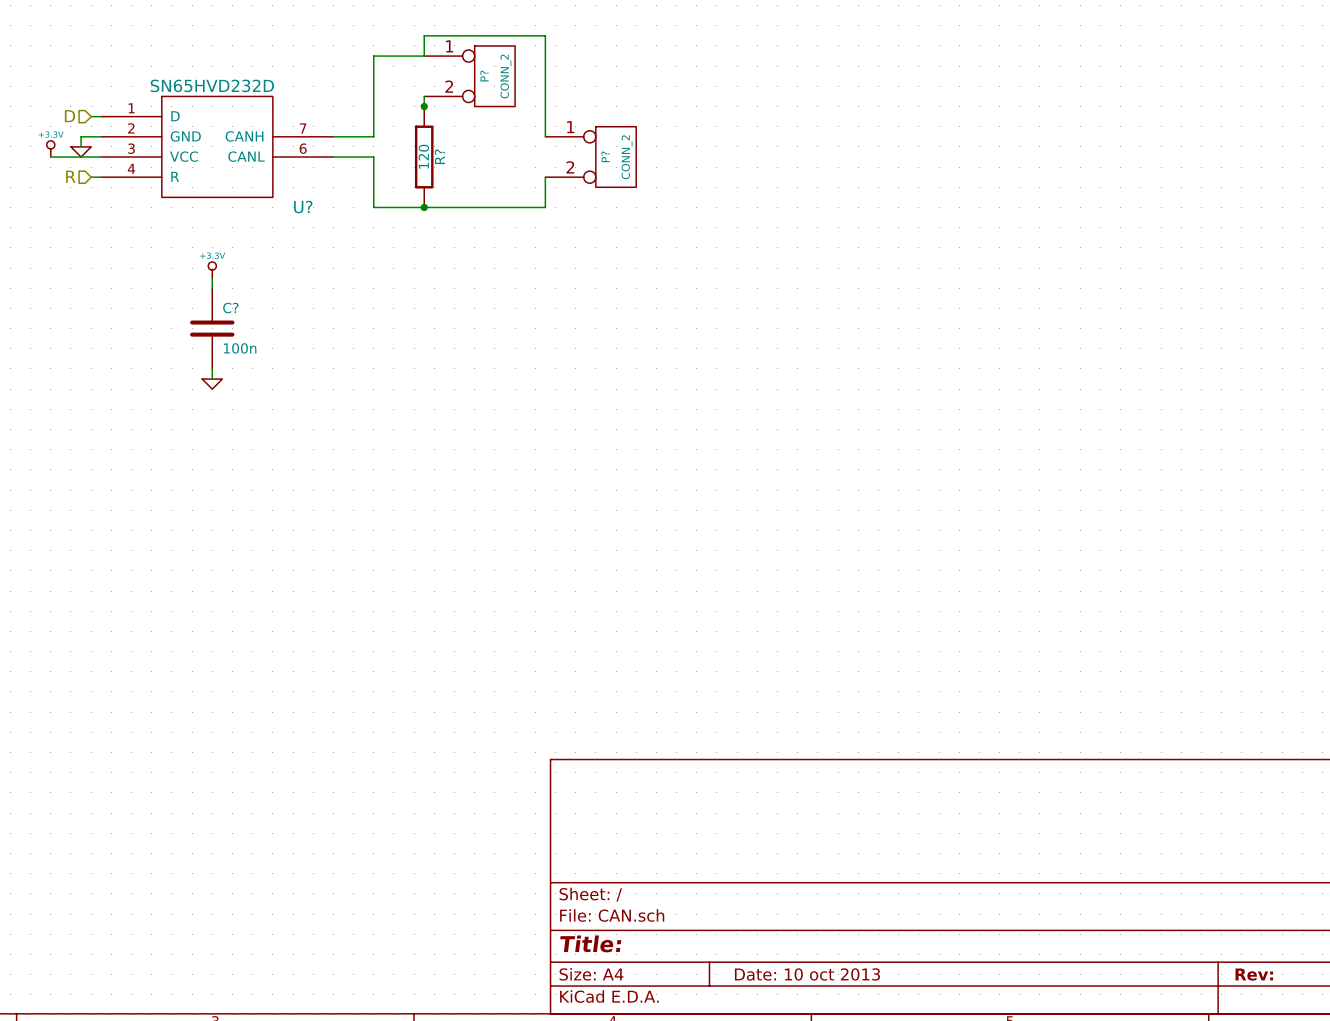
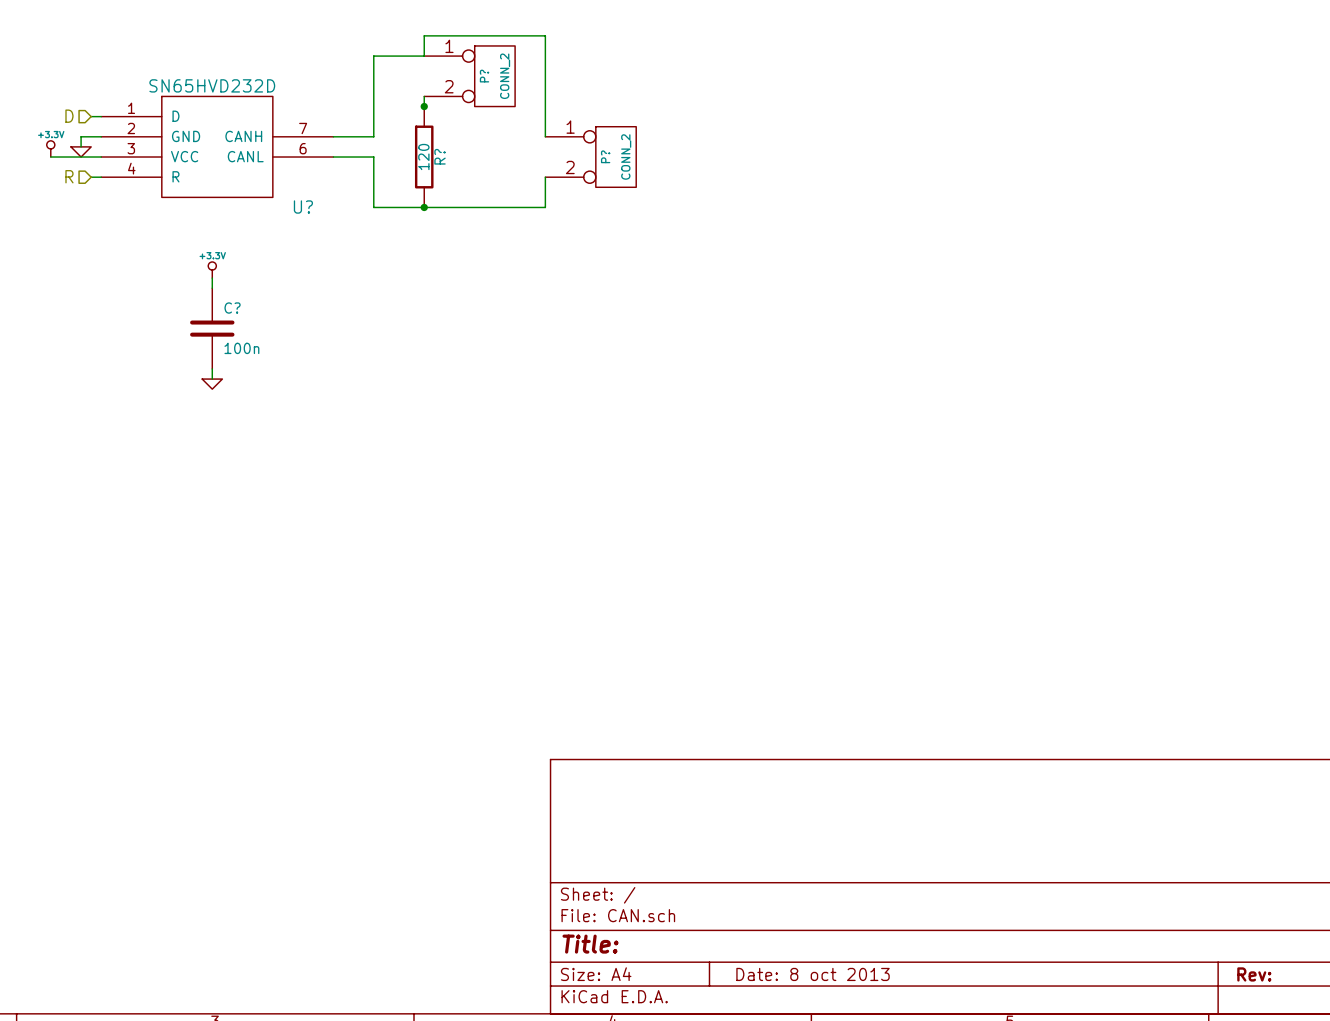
title block: Date: 10 oct 2013 (807, 974) -> Date: 8 oct 2013 (813, 974)

